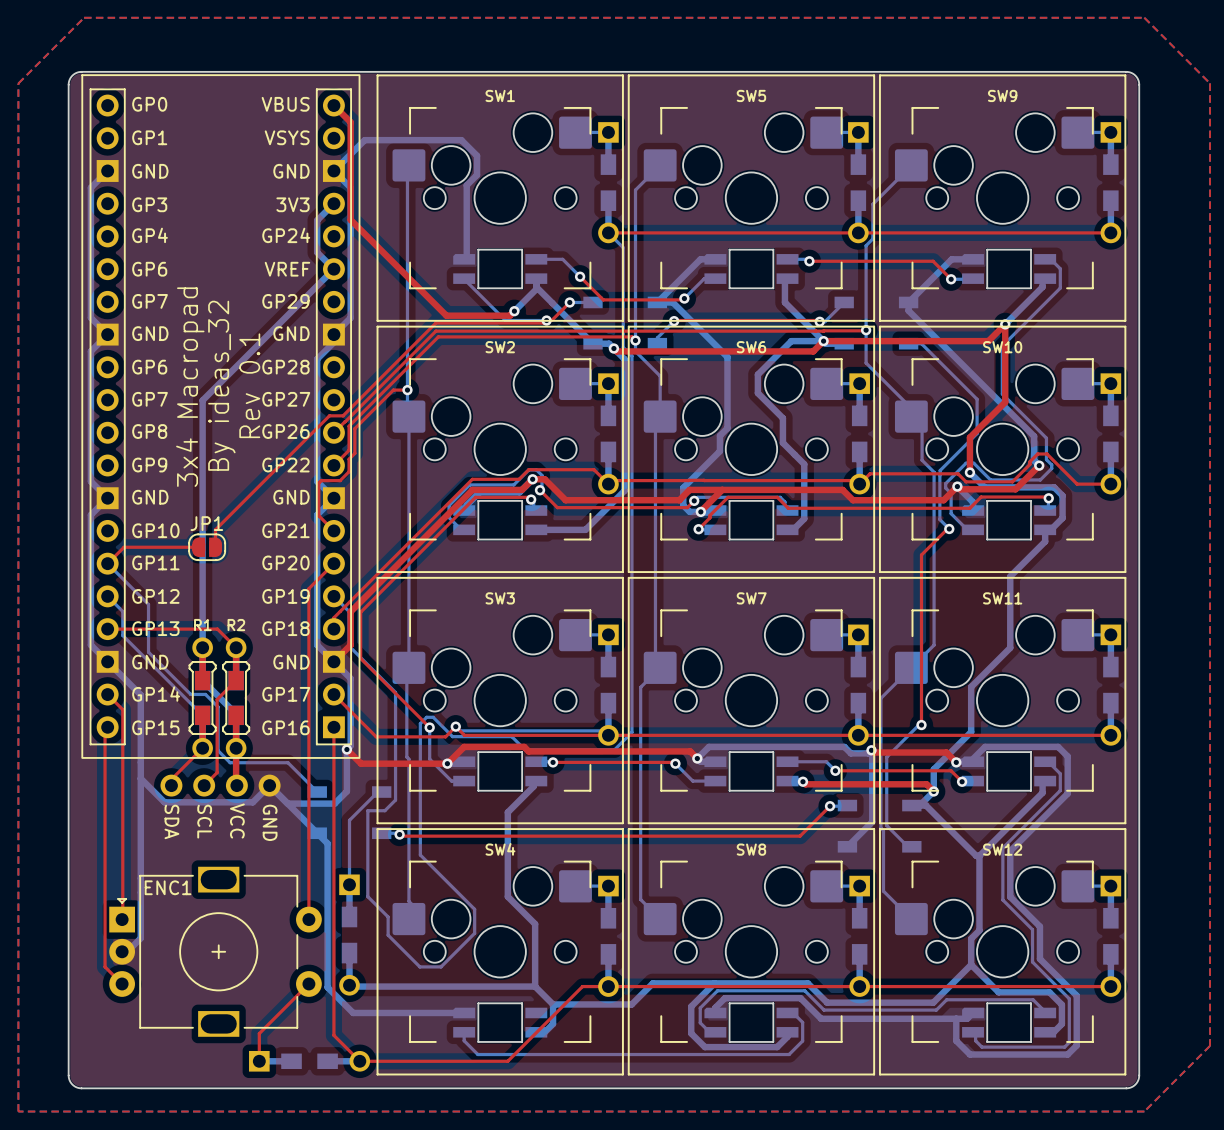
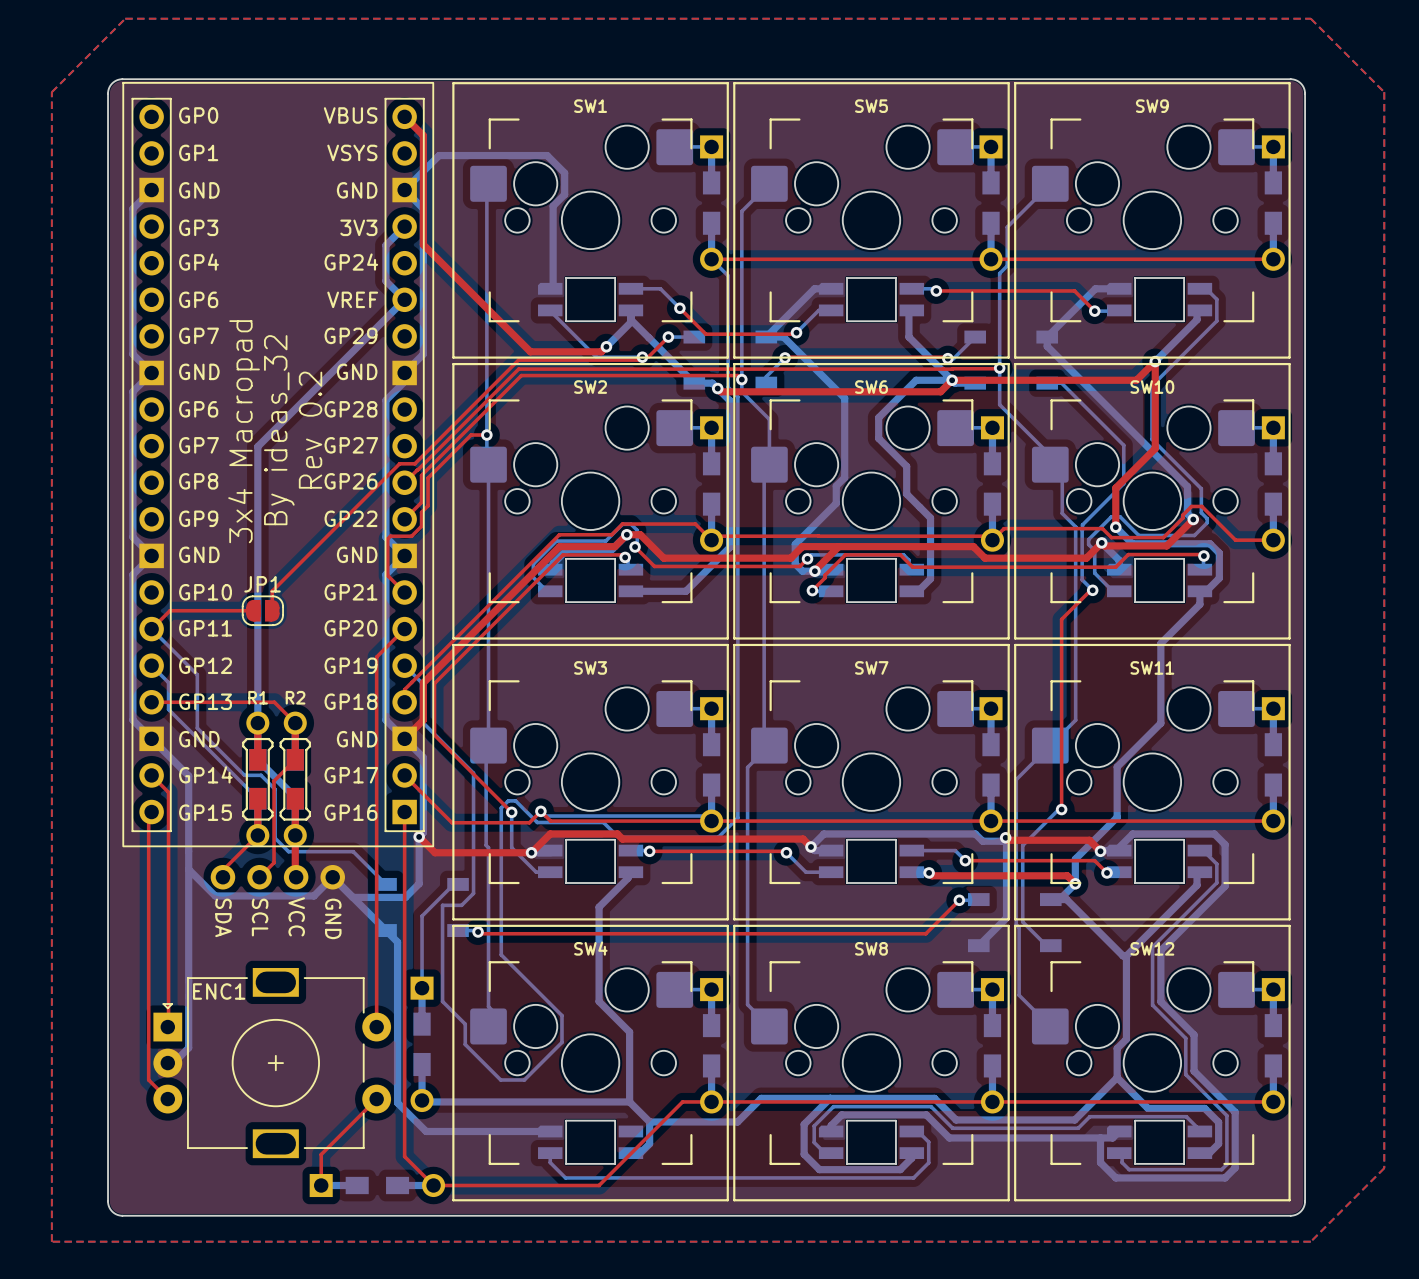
text: Rev 0.1 (249, 385) -> Rev 0.2 (310, 430)

